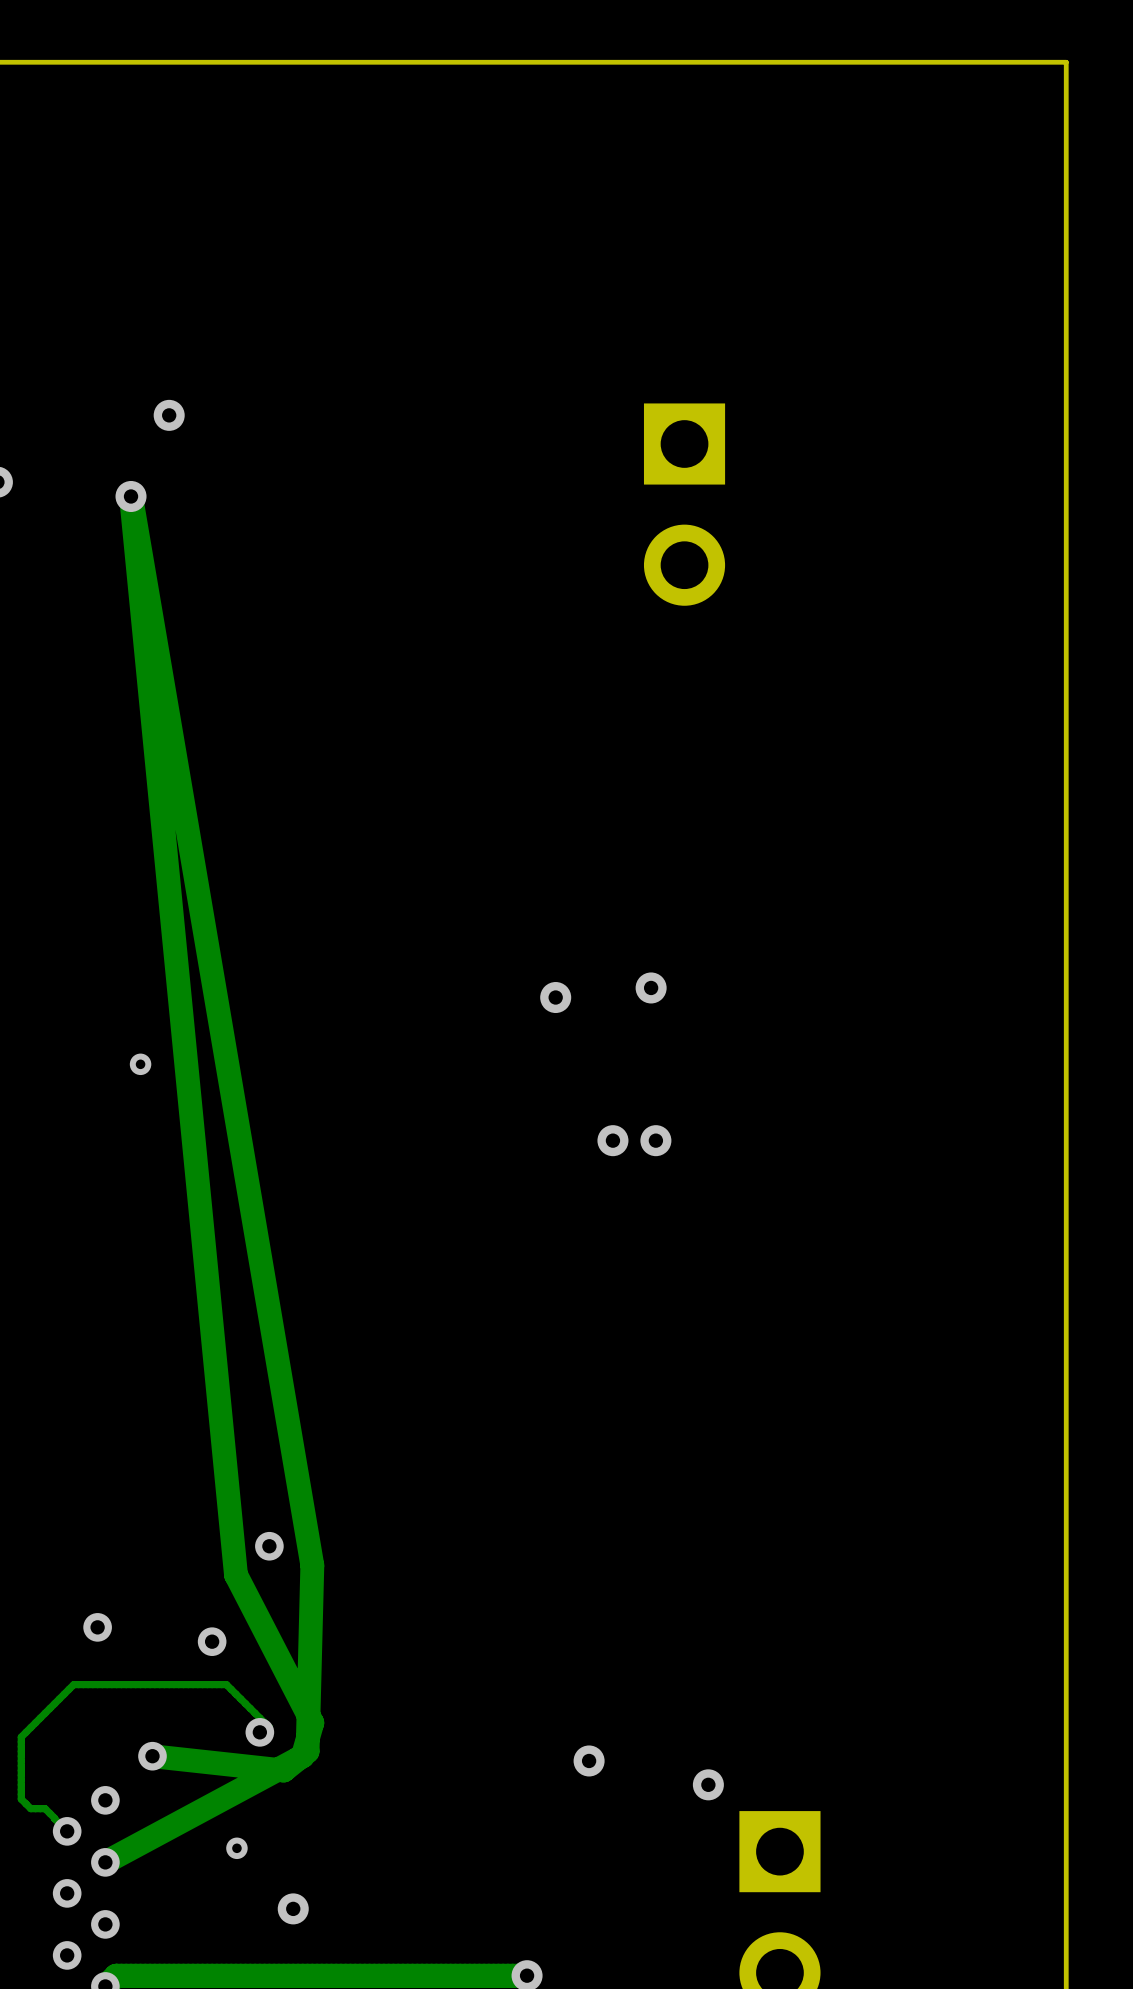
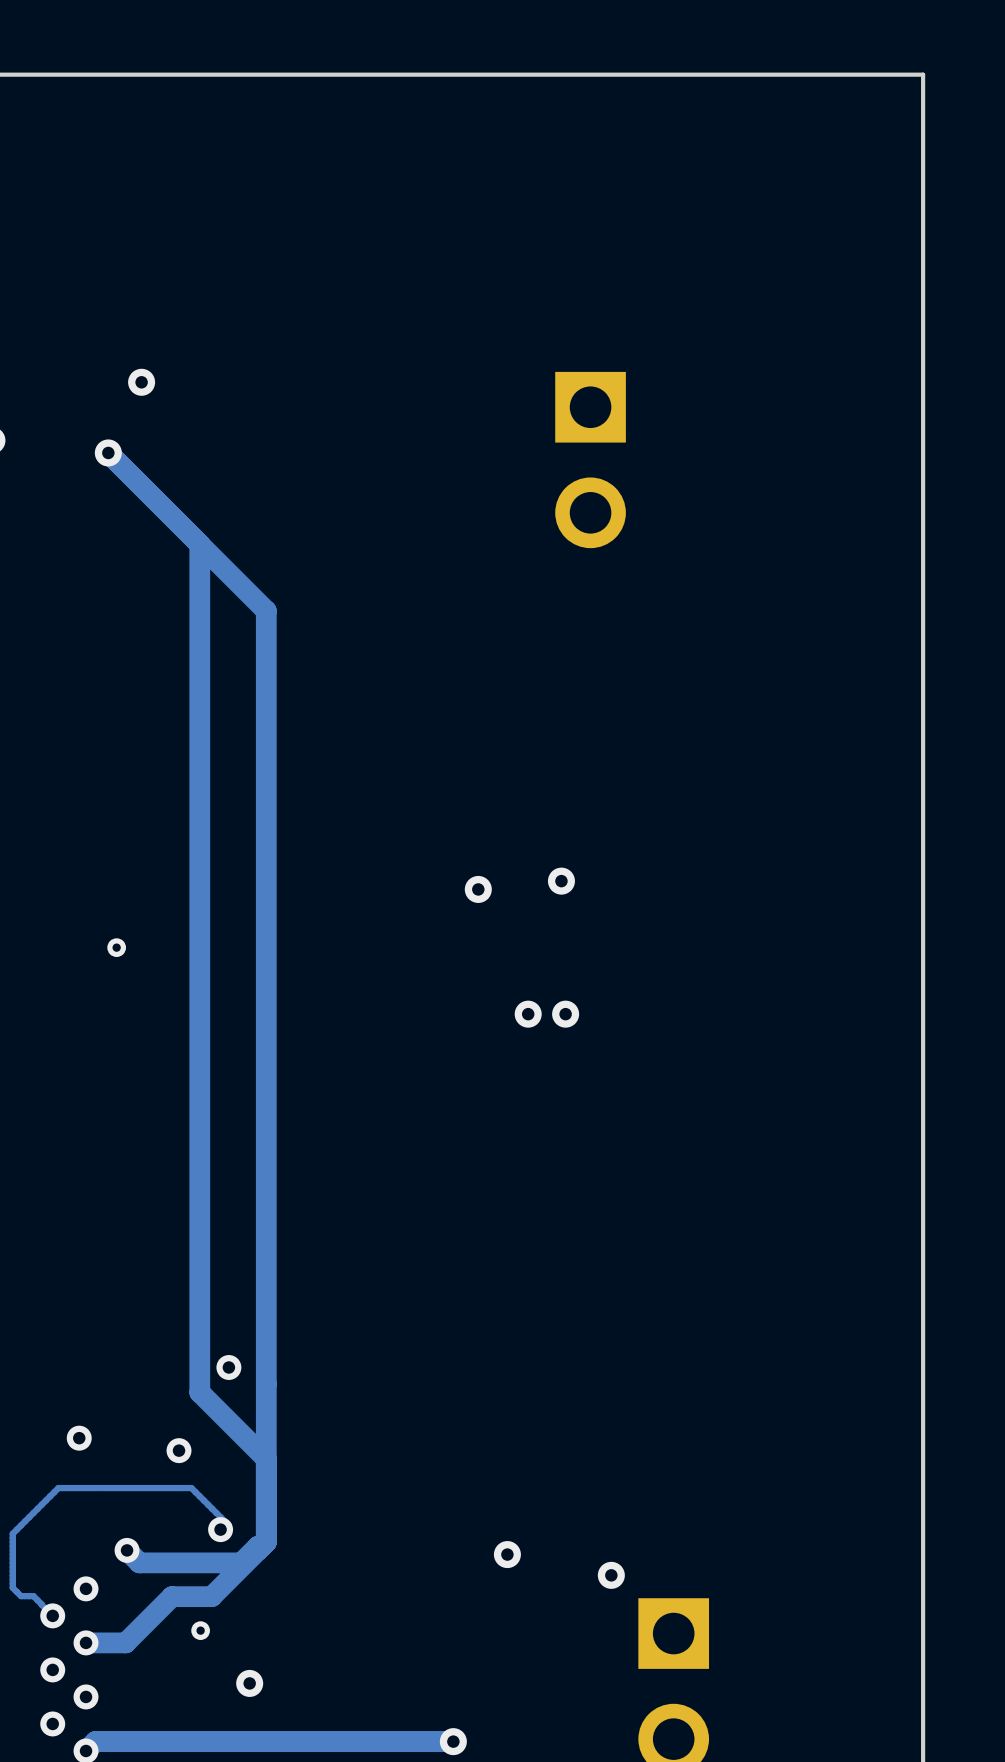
track: none -> (108, 452) (266, 610) (266, 1542) (211, 1596) (171, 1596) (125, 1642) (86, 1642)
track: none -> (199, 544) (199, 1392) (266, 1458)
track: (152, 1756) (283, 1770) (307, 1751) (312, 1565) (131, 496) (235, 1574) (312, 1722) (302, 1756) (105, 1862) -> (127, 1550) (139, 1562) (241, 1562) (257, 1546) (262, 1546)

